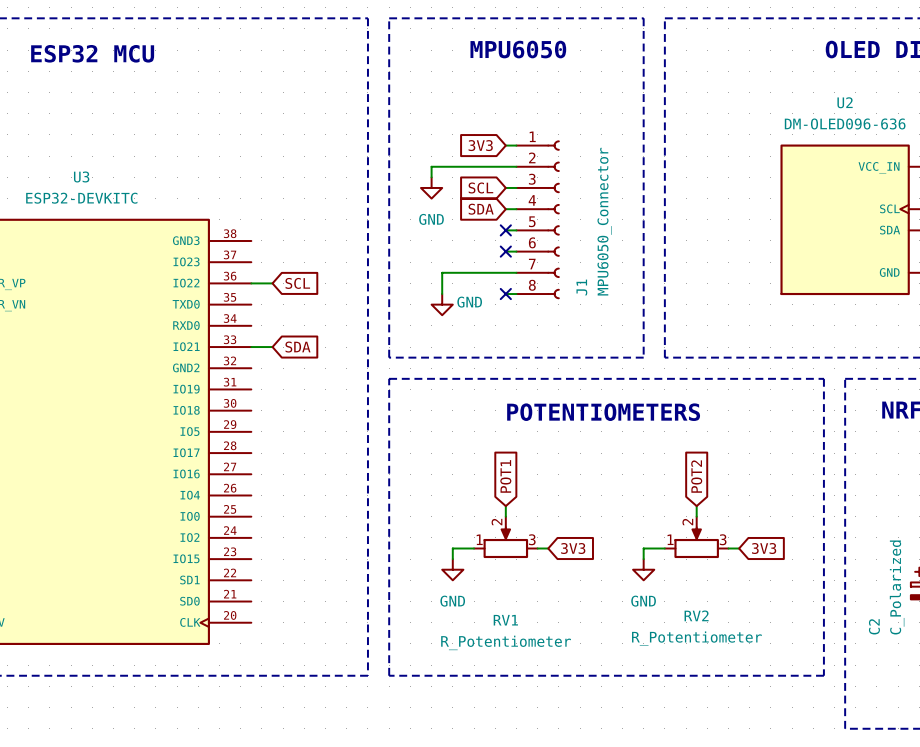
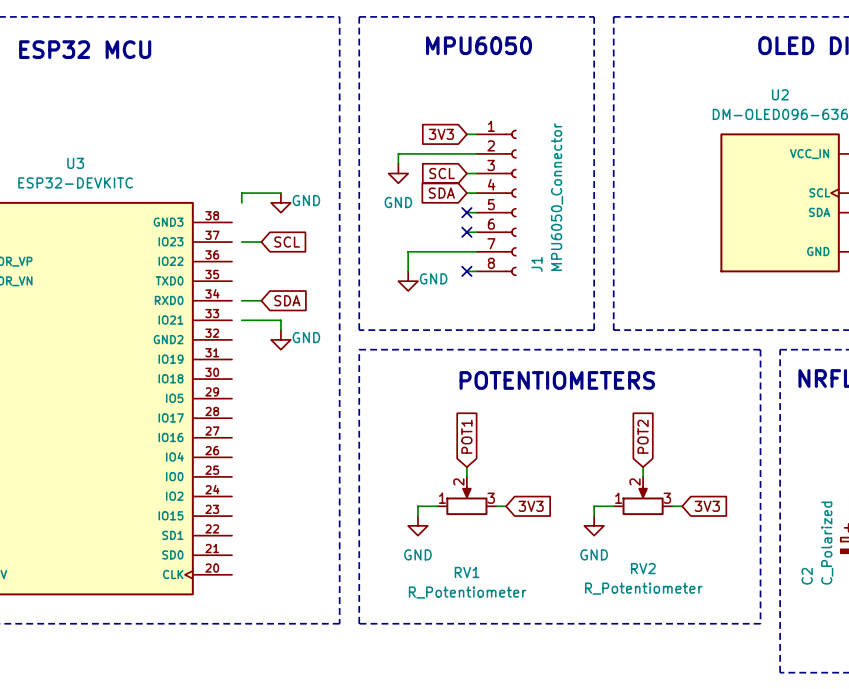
wire: none -> (280, 193) (241, 193) (241, 202)
power symbol: none -> GND (280, 202)
wire: (251, 283) (272, 283) -> (241, 242) (261, 242)
global label position: SCL (297, 283) -> SCL (287, 242)
wire: none -> (241, 300) (261, 300)
wire: (251, 347) (261, 347) -> none
wire: none -> (251, 320) (280, 320) (280, 330)
global label position: SDA (297, 347) -> SDA (287, 300)
power symbol: none -> GND (280, 339)

